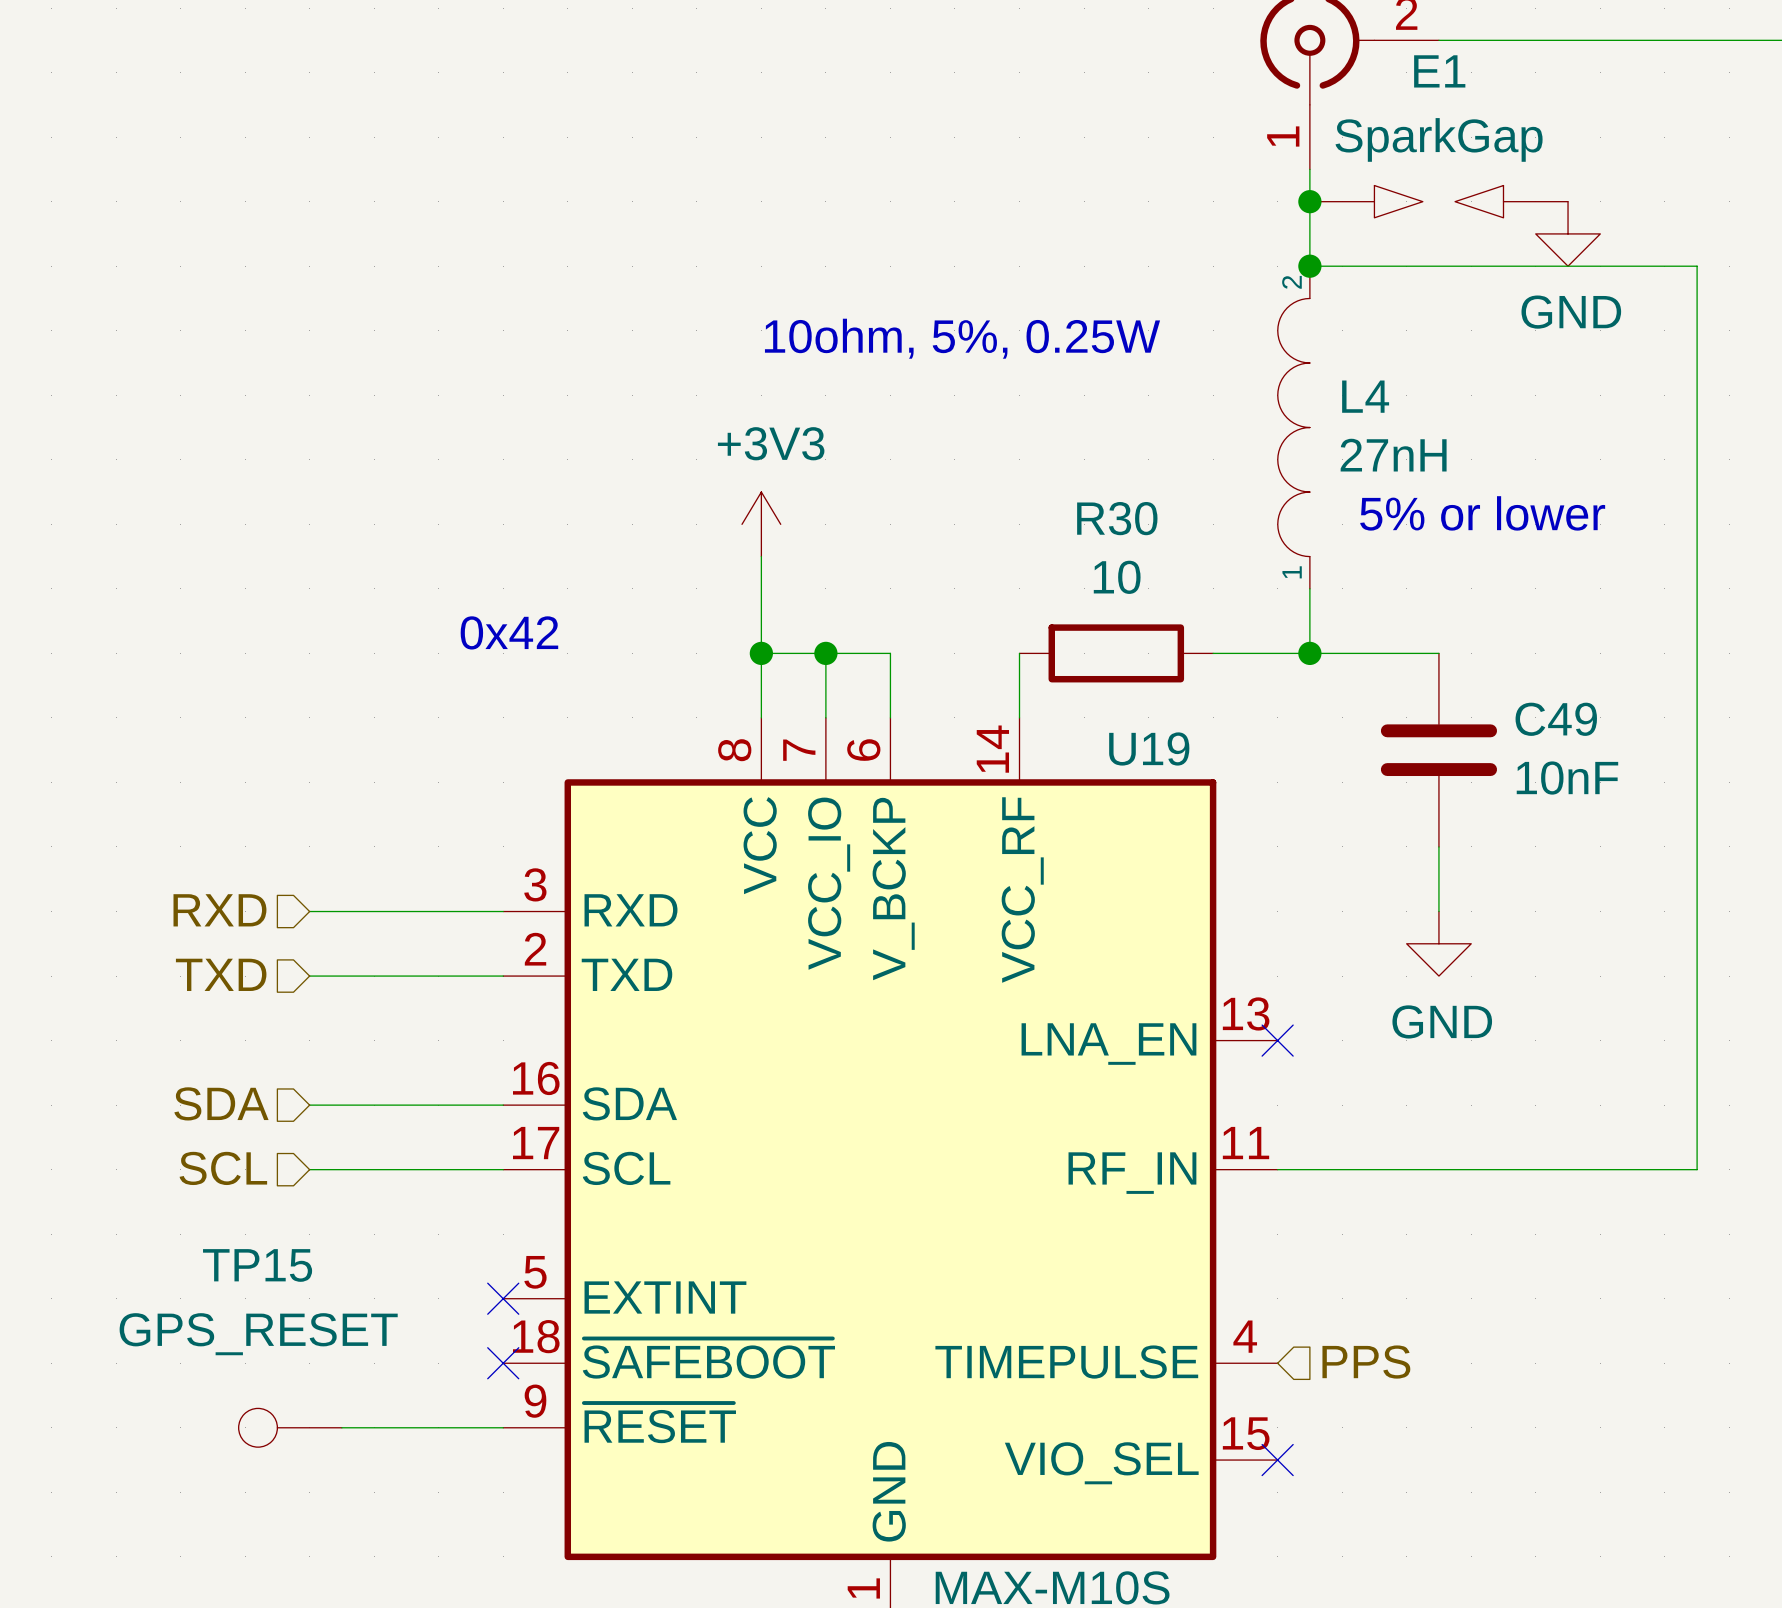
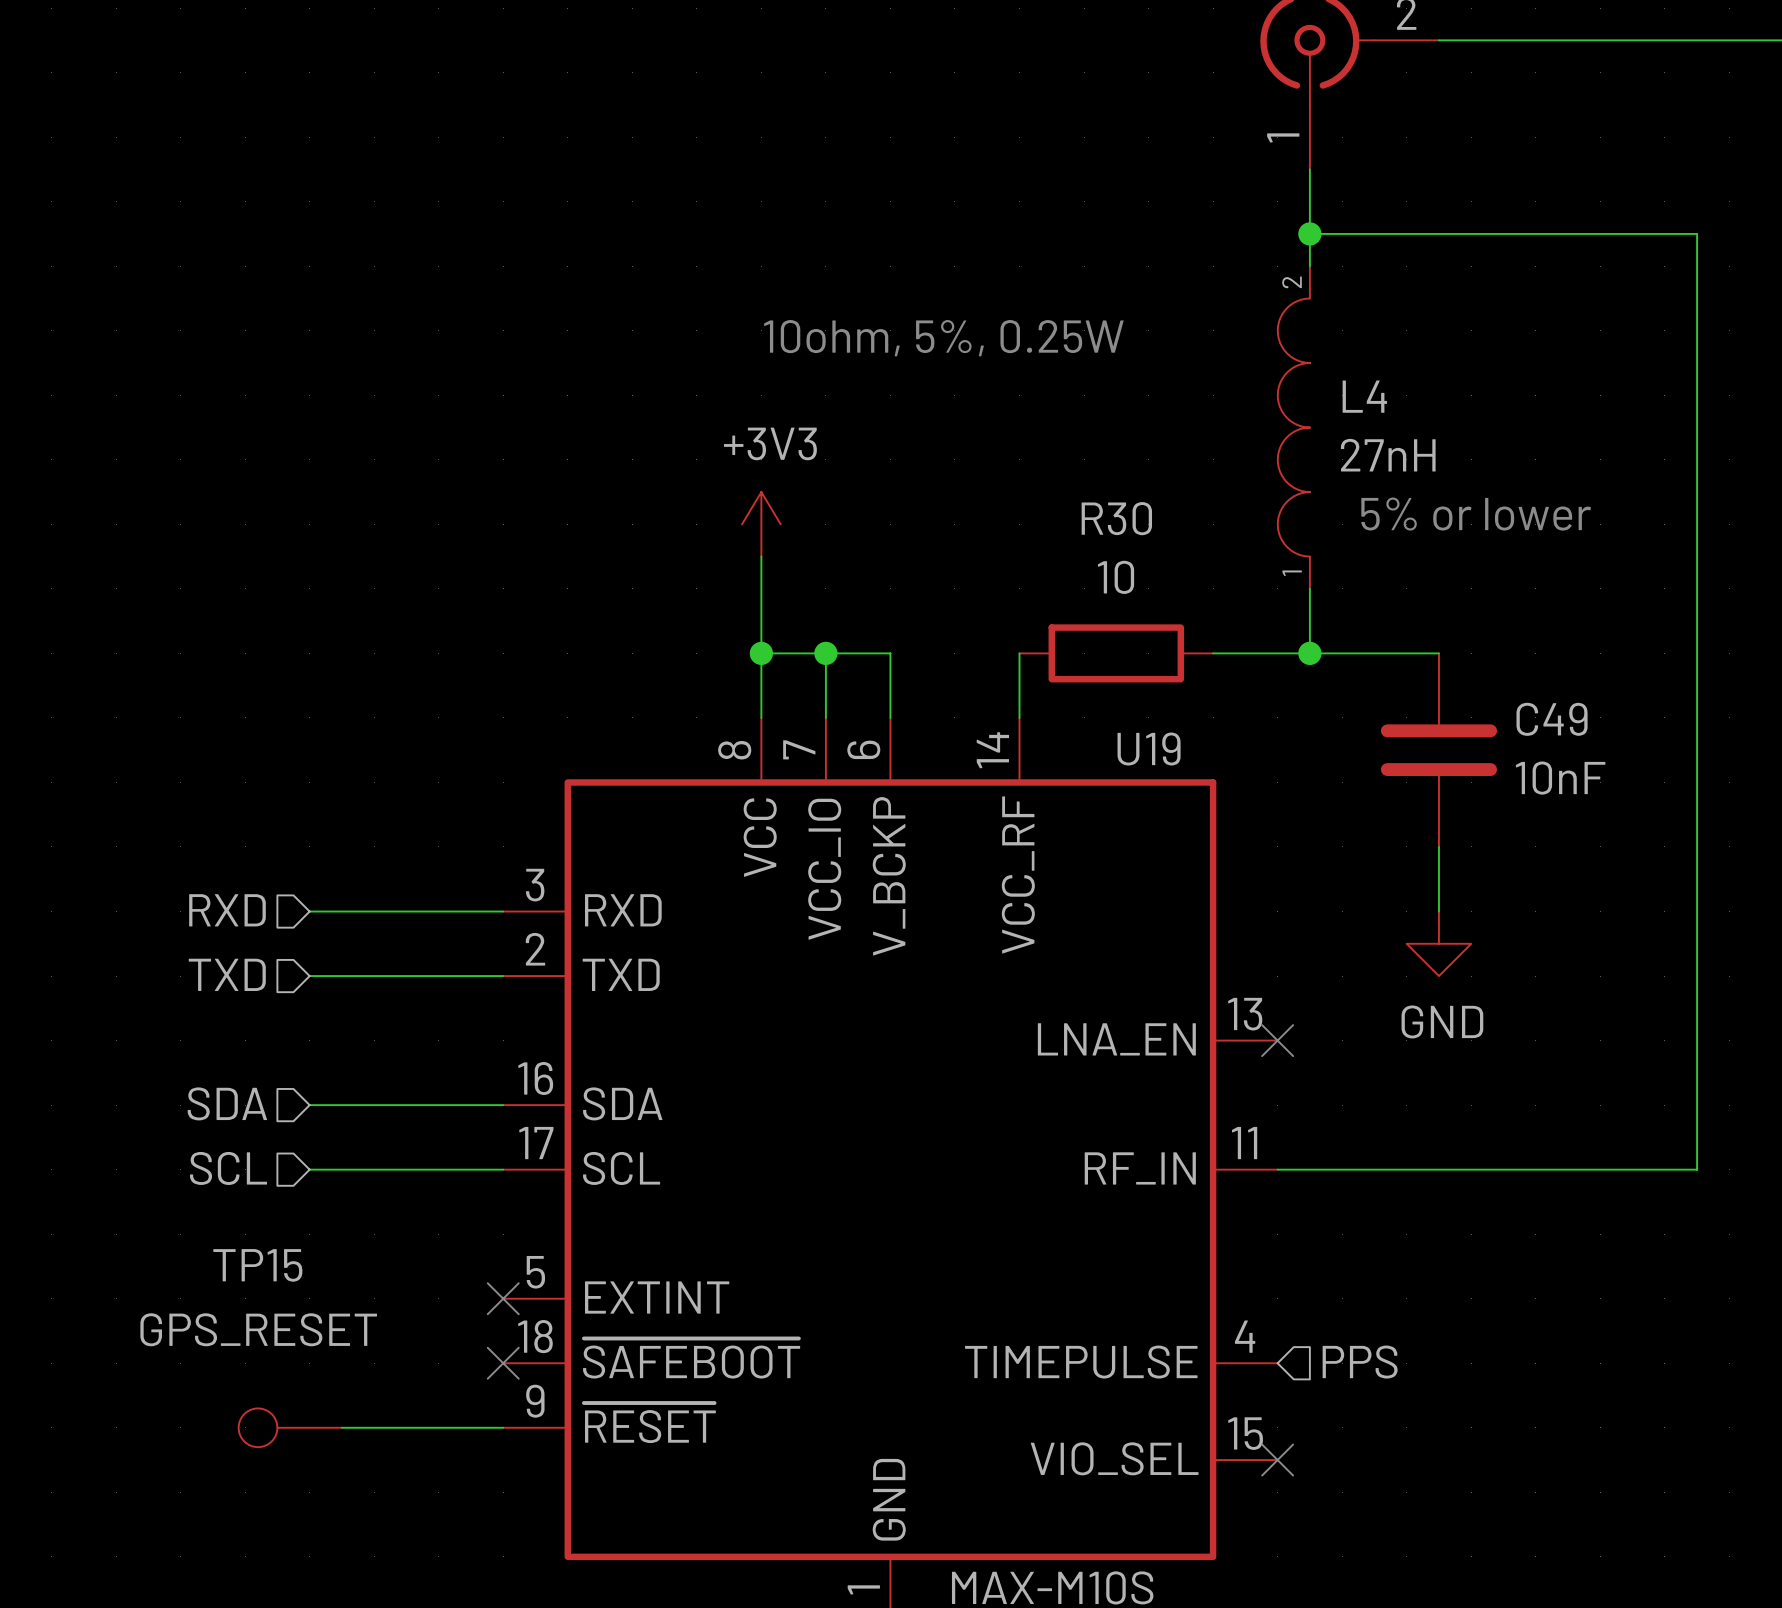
junction: (1309, 201) -> none
E1: SparkGap (1438, 201) -> none
junction: none -> (1309, 233)
power symbol: GND (1568, 233) -> none
wire: (1309, 266) (1697, 266) -> (1309, 233) (1697, 233) (1697, 266)
junction: (1309, 266) -> none
text: 0x42 (509, 632) -> none

